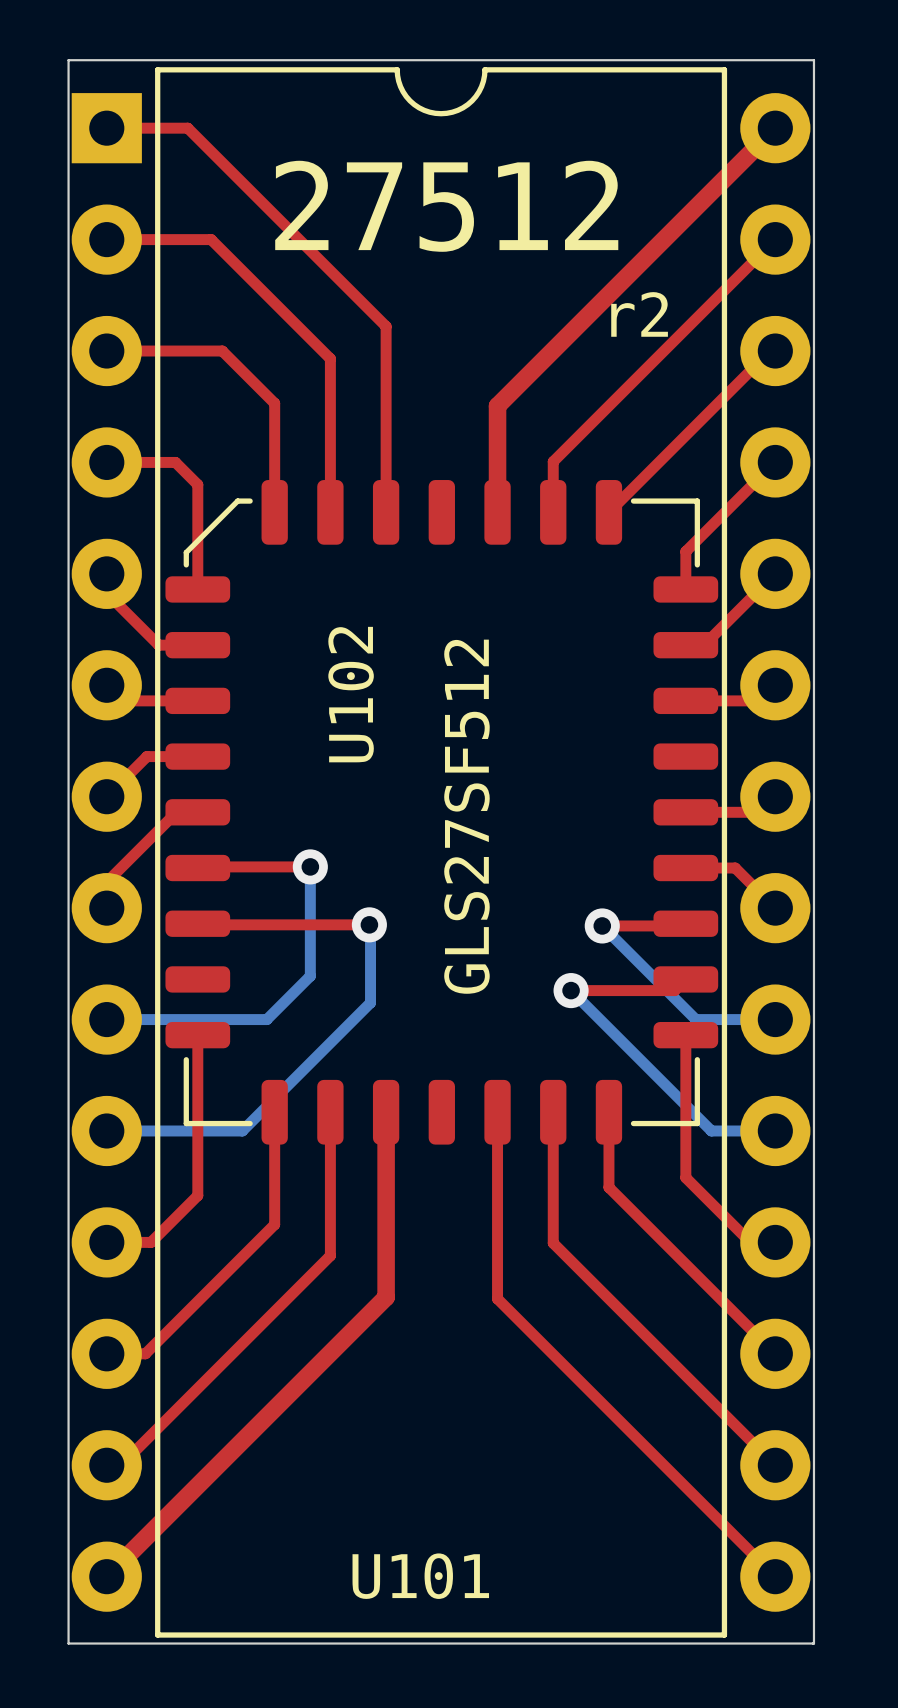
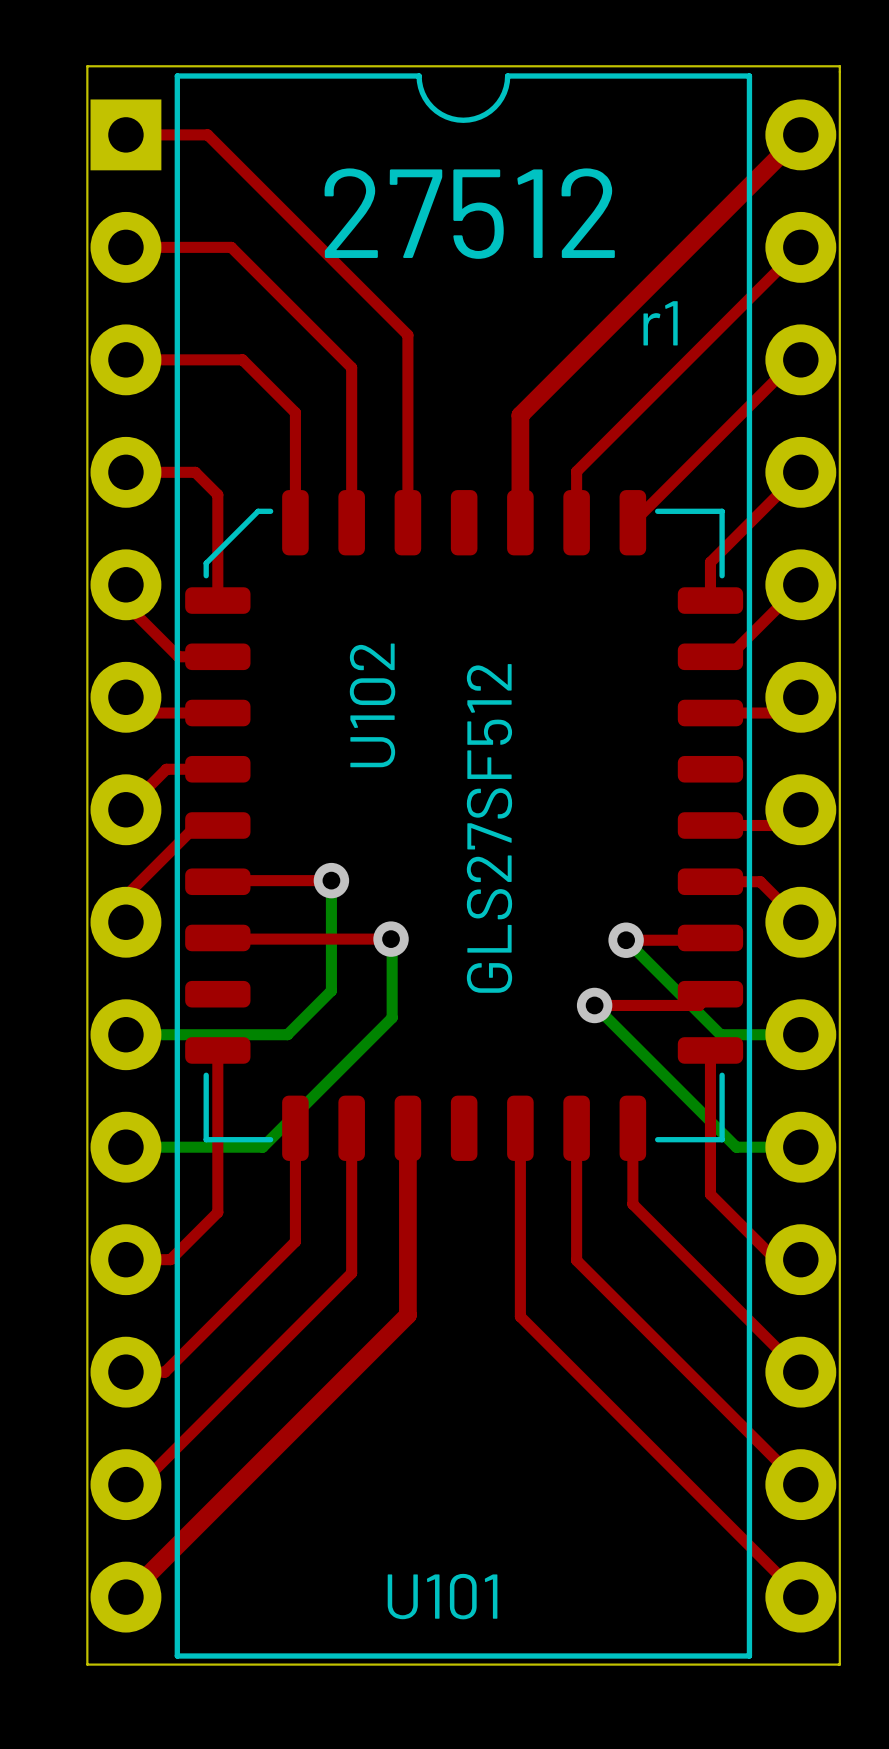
text: r2 (639, 314) -> r1 (660, 323)

